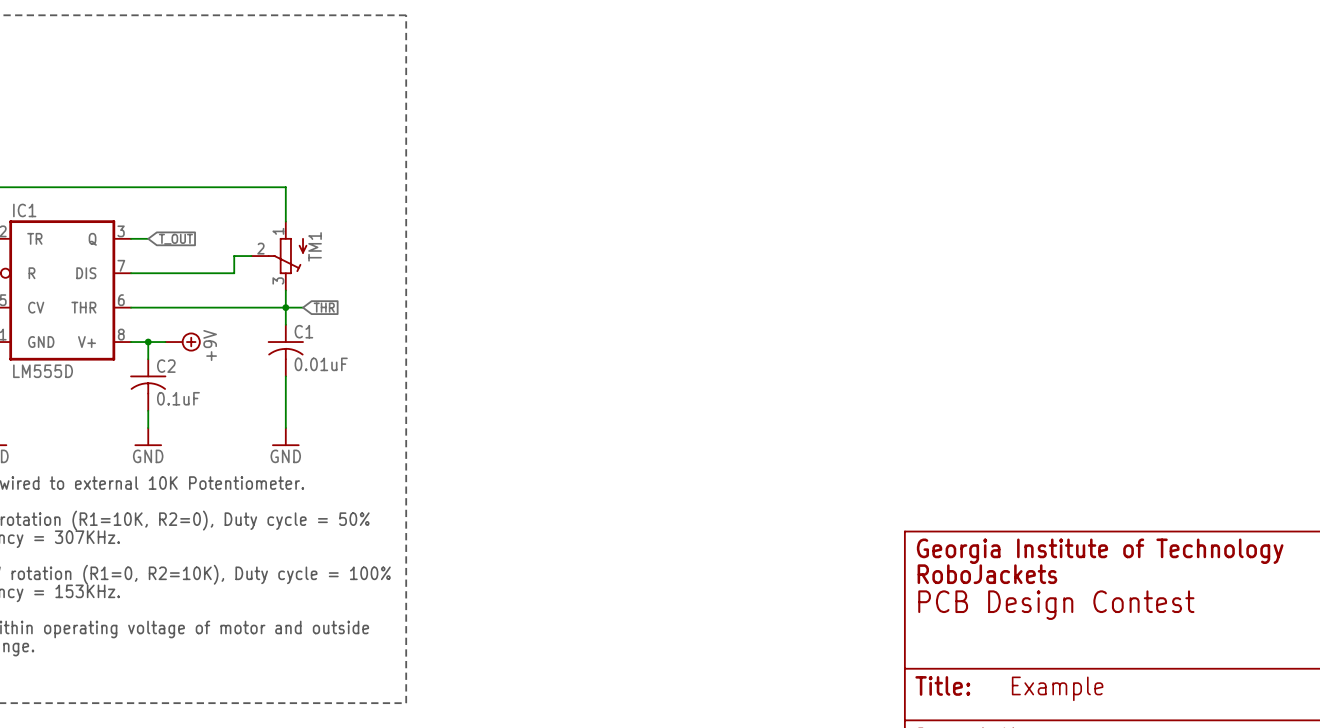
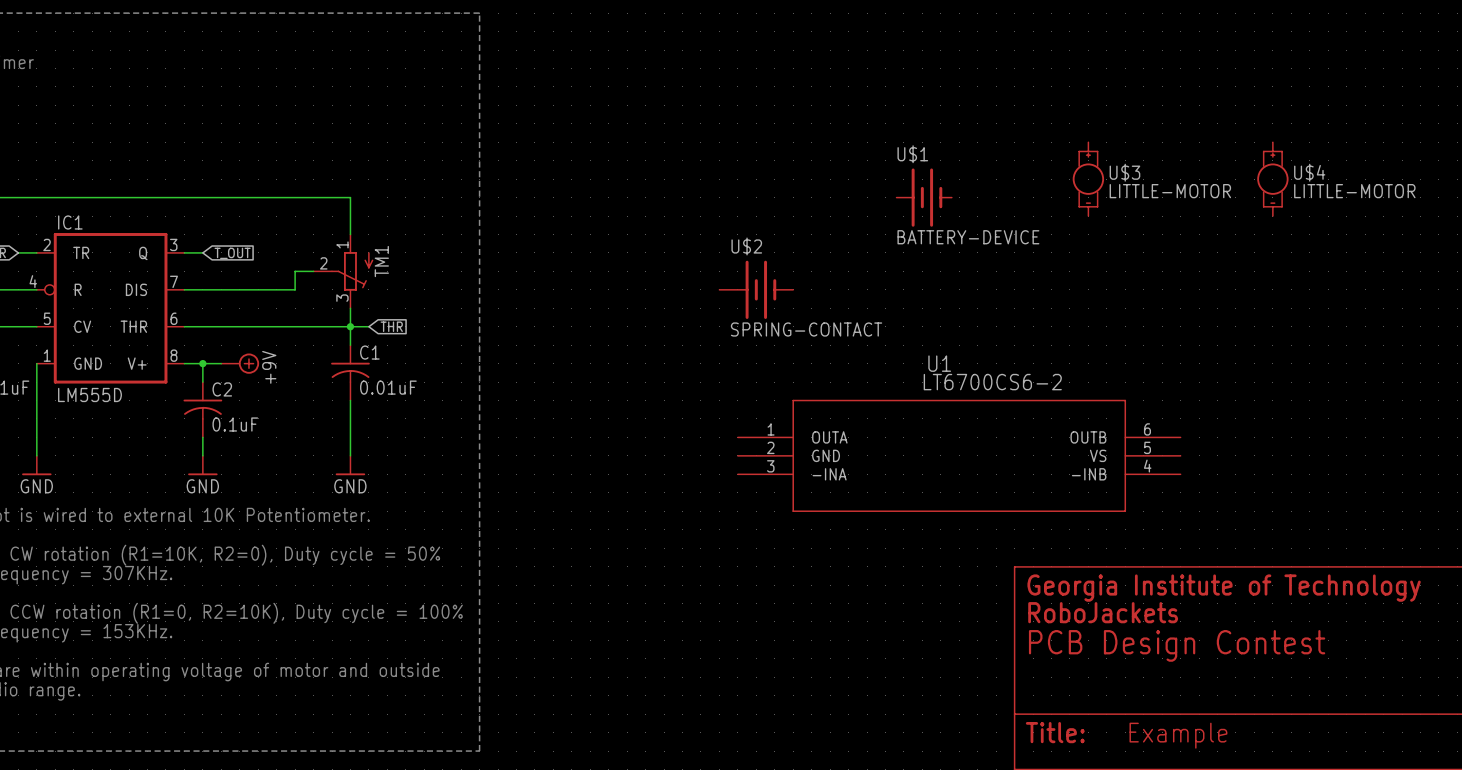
U$3: none -> LITTLE-MOTOR (1088, 179)
U$4: none -> LITTLE-MOTOR (1272, 179)
U$1: none -> BATTERY-DEVICE (924, 197)
U$2: none -> SPRING-CONTACT (756, 289)
U1: none -> LT6700CS6-2 (959, 455)

